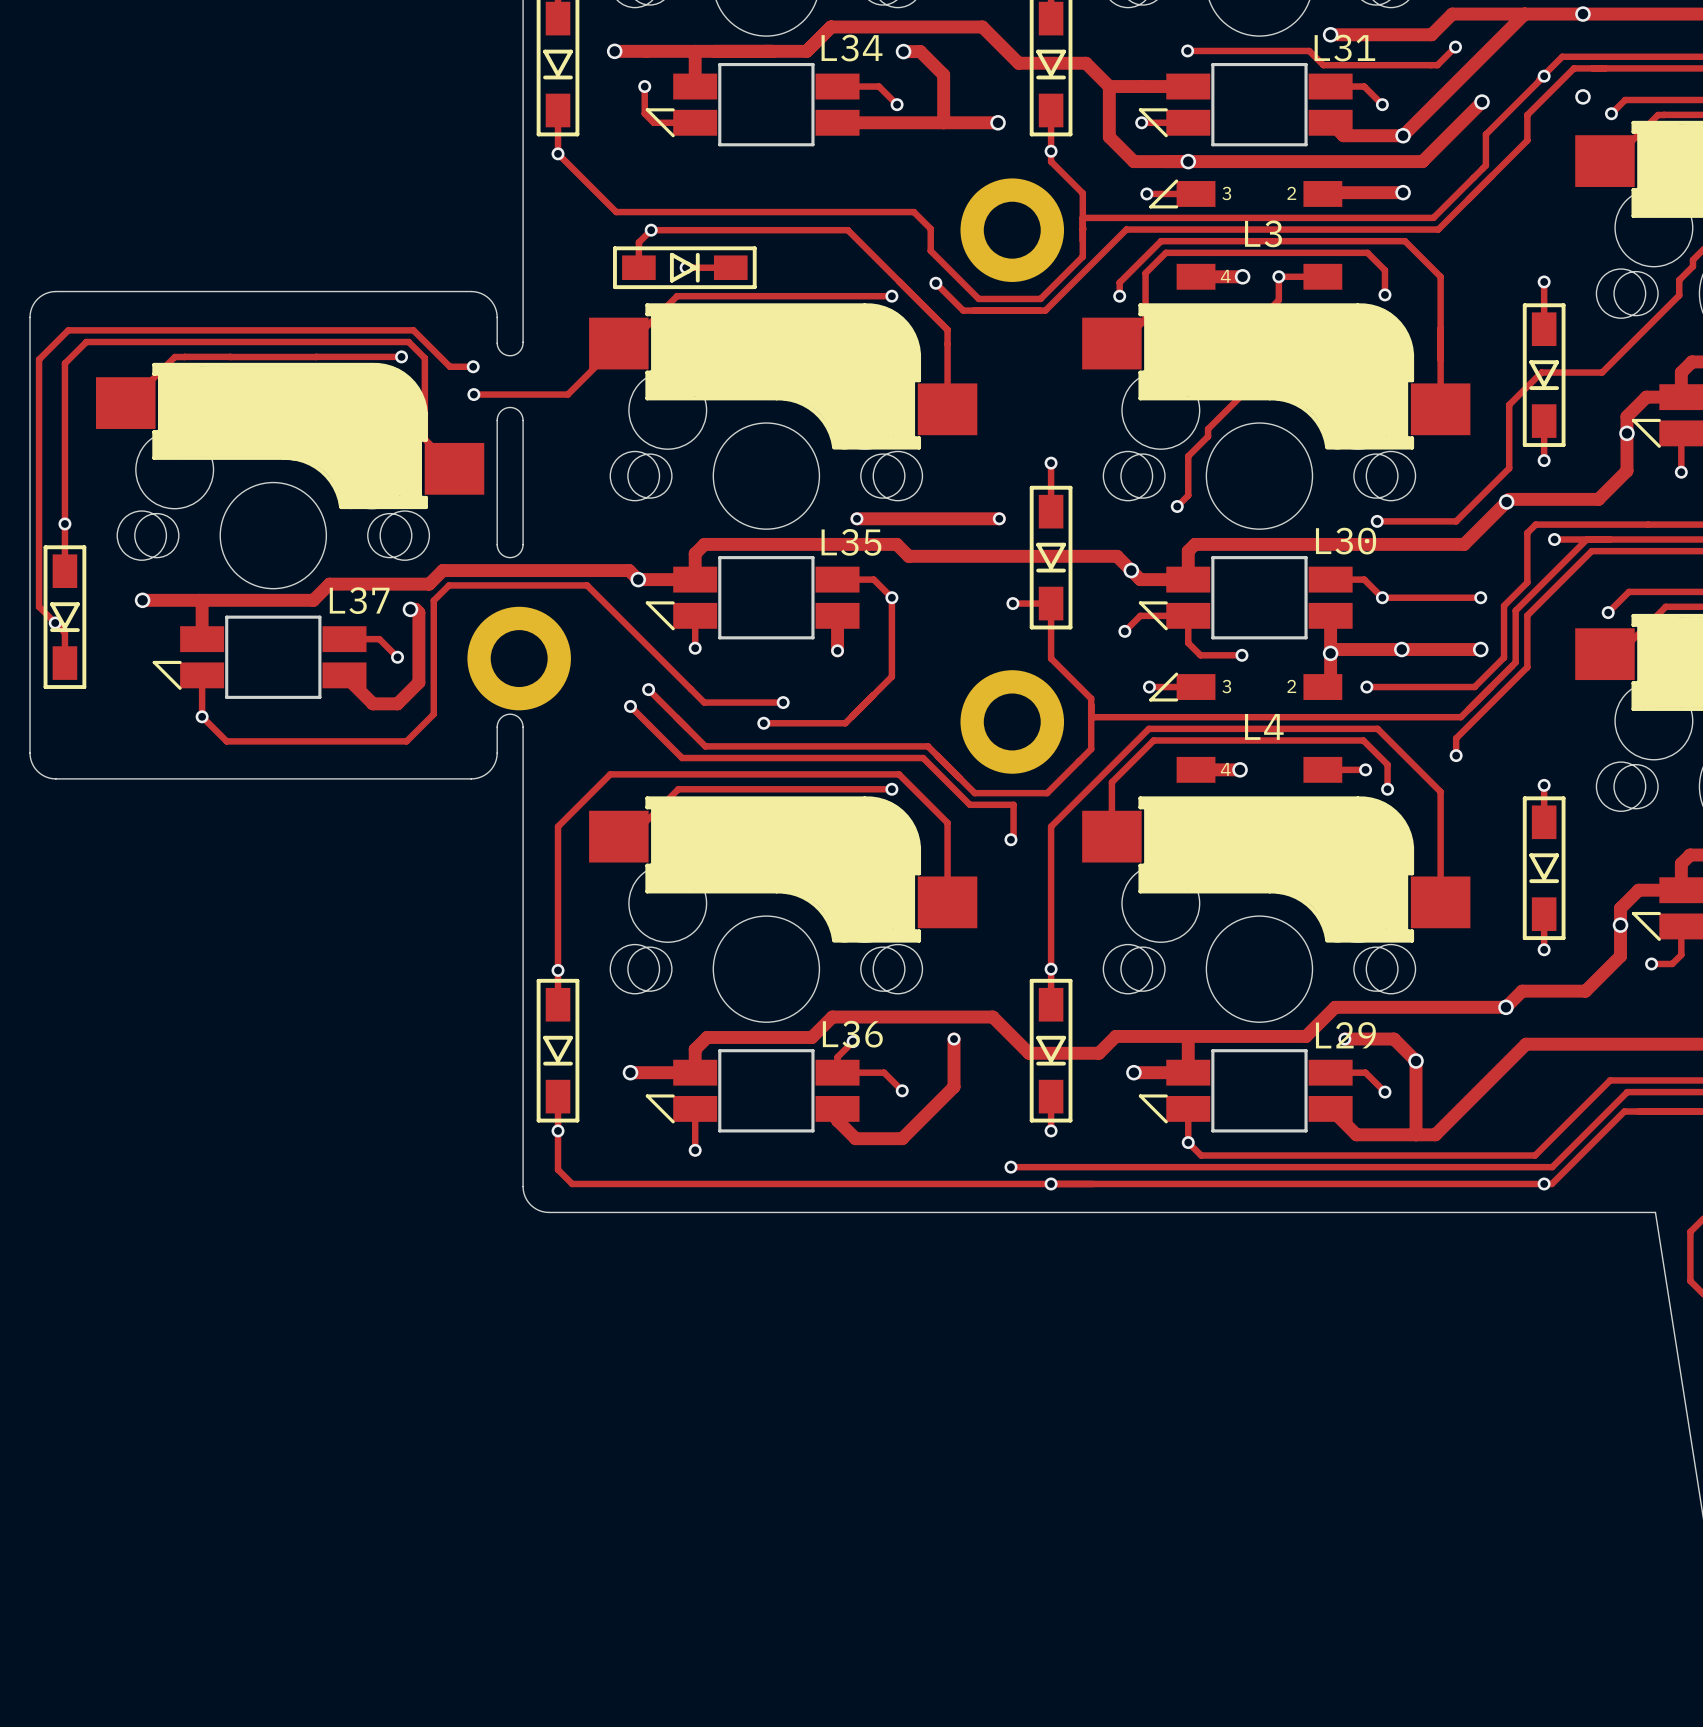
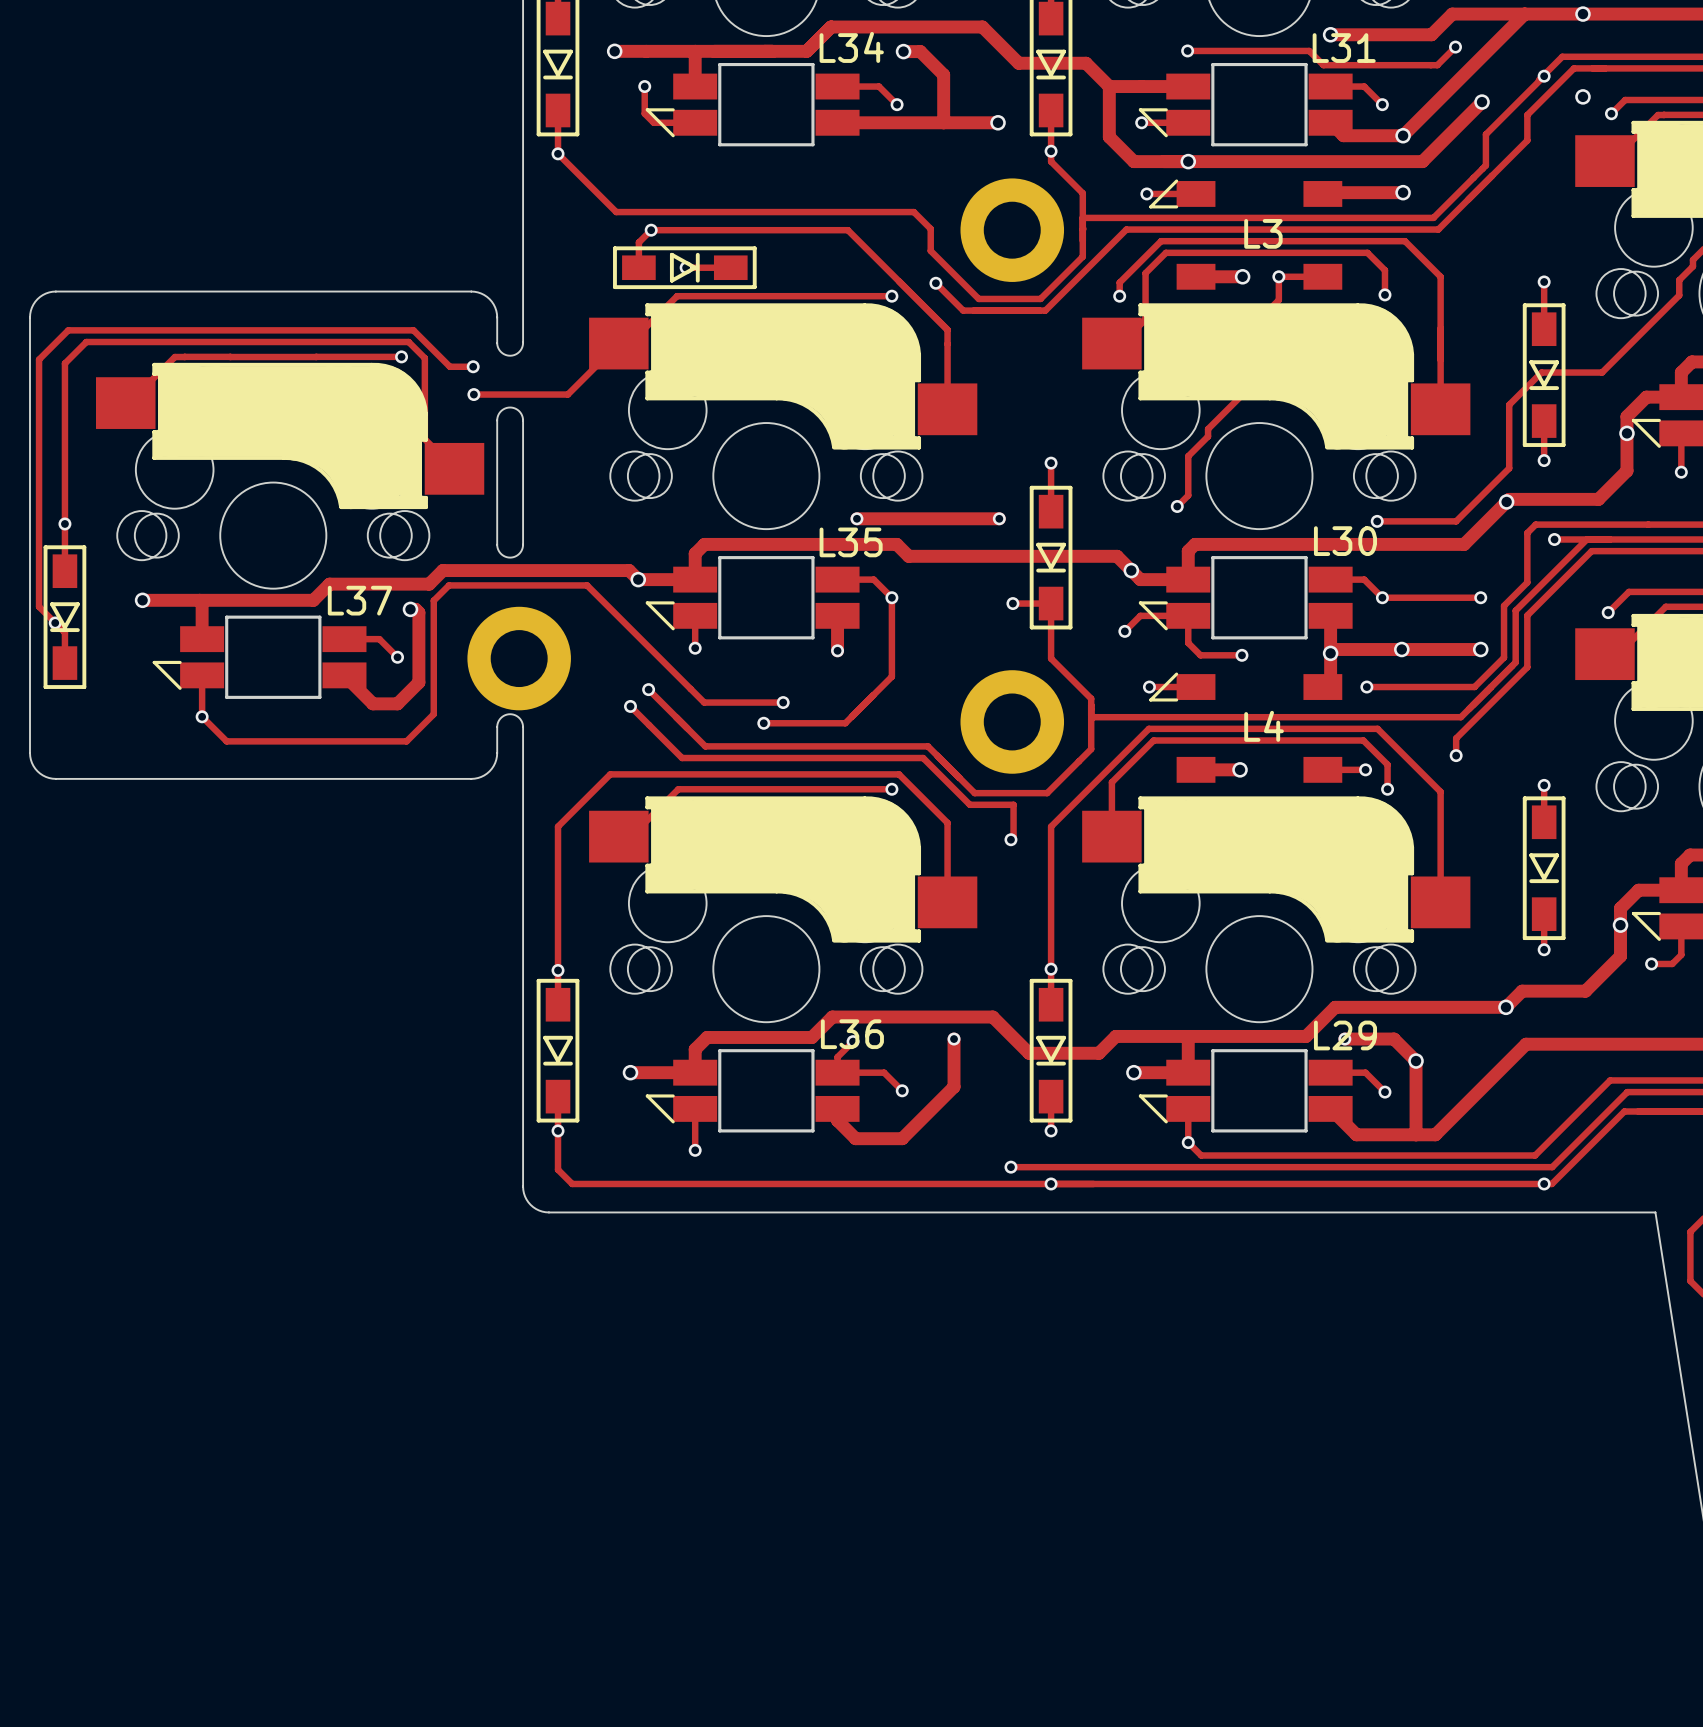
L3 text: 3 (1226, 193) -> none
L3 text: 2 (1291, 193) -> none
L3 text: 4 (1225, 276) -> none
L4 text: 3 (1226, 686) -> none
L4 text: 2 (1291, 686) -> none
L4 text: 4 (1225, 769) -> none

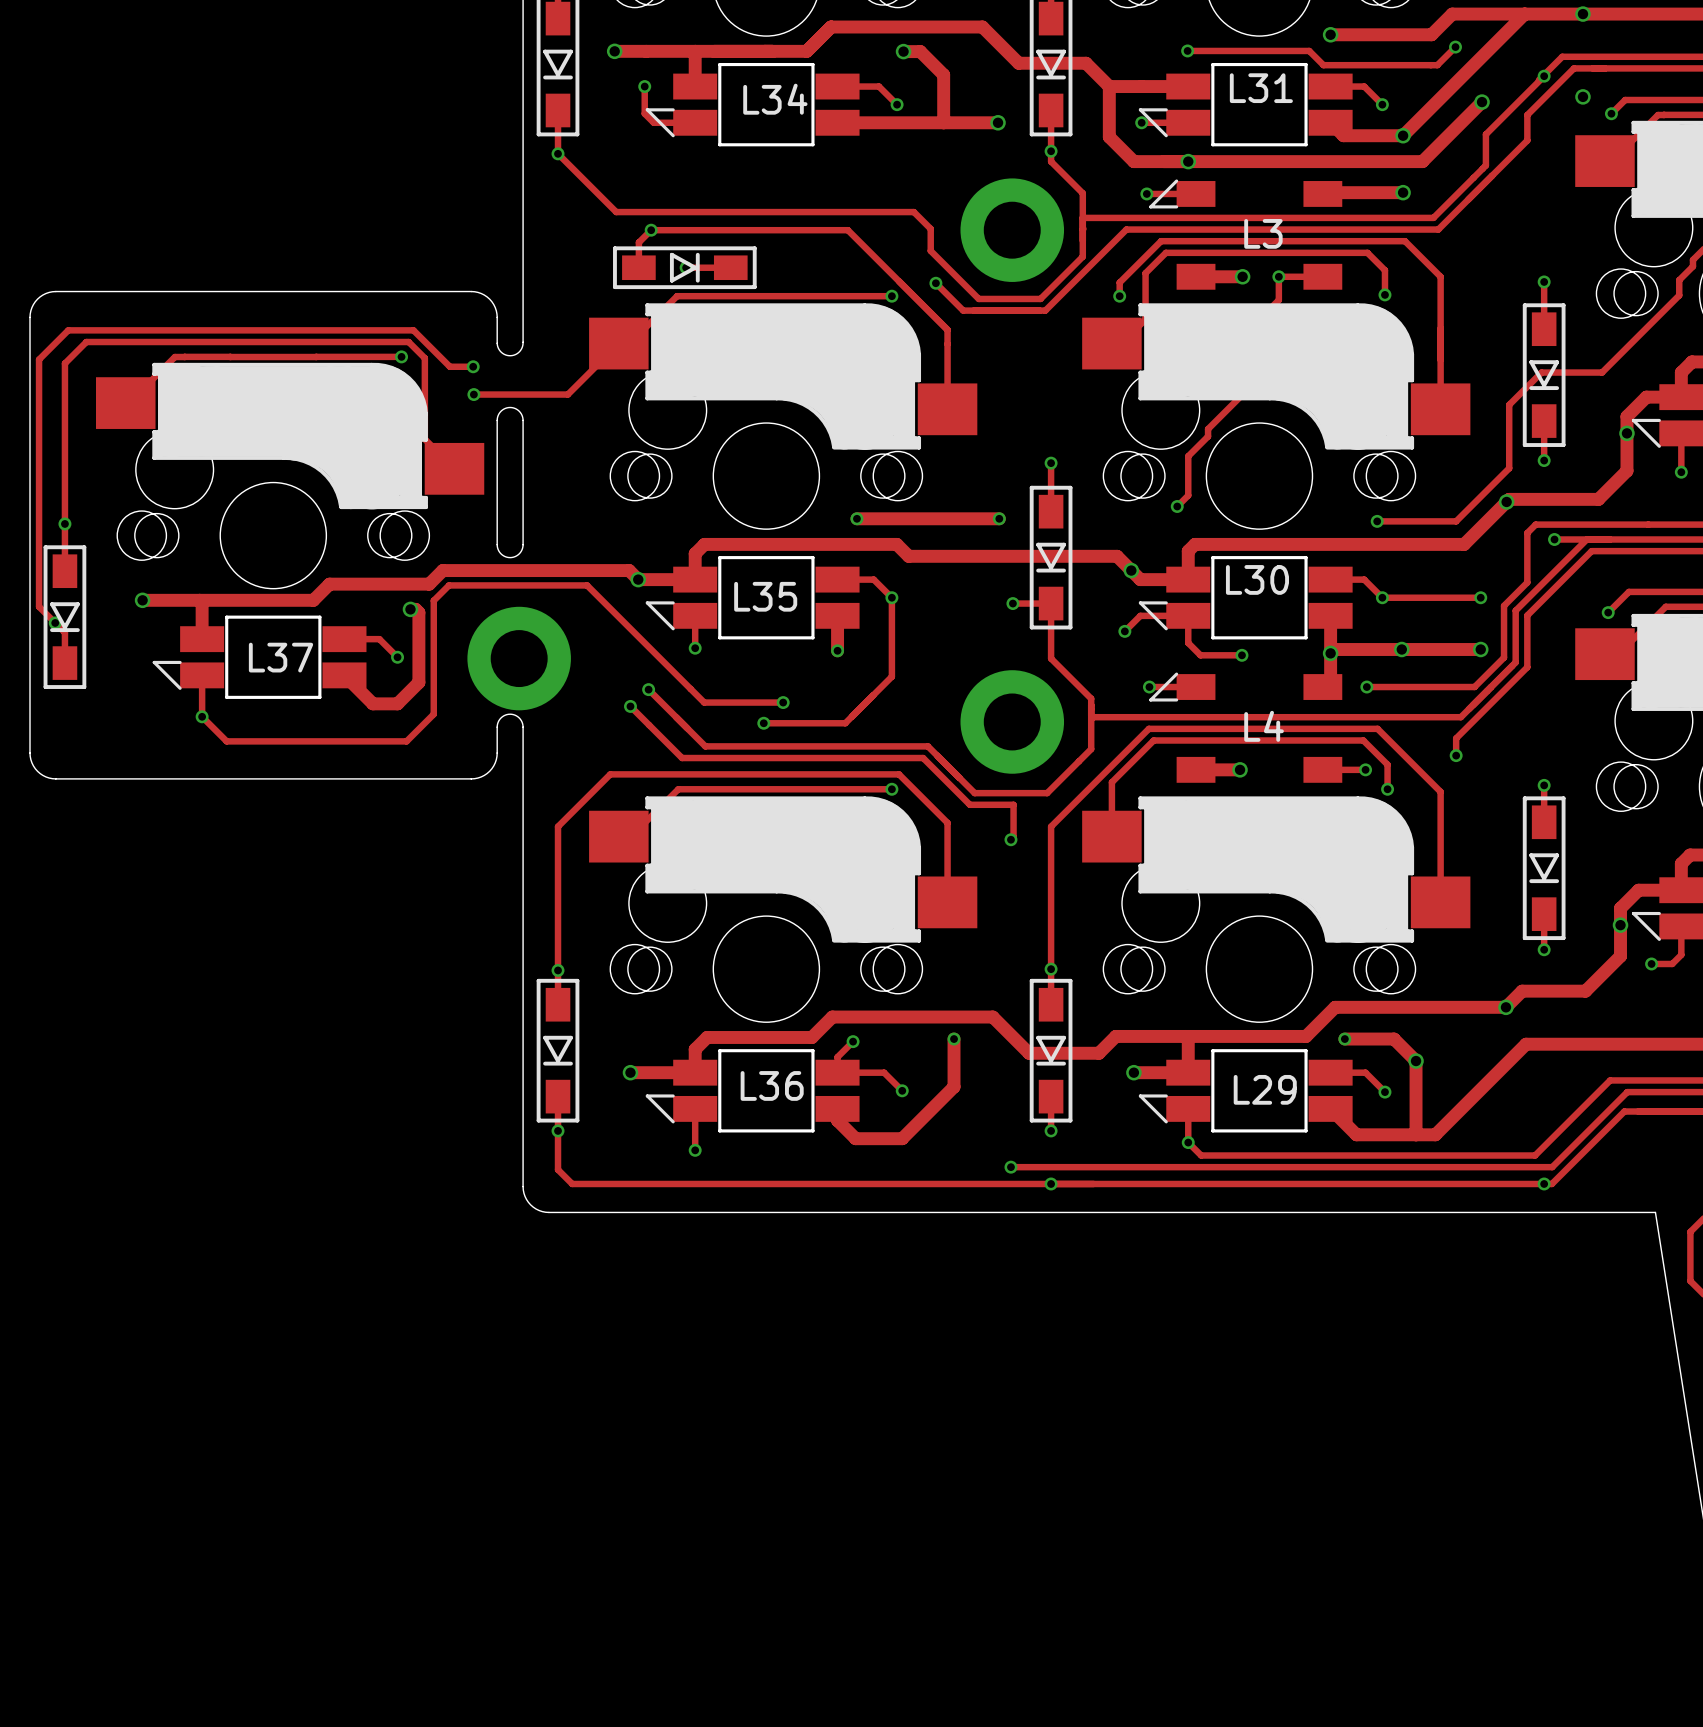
L34 name position: L34 (851, 47) -> L34 (775, 99)
L31 name position: L31 (1344, 48) -> L31 (1261, 88)
L30 name position: L30 (1345, 541) -> L30 (1257, 579)
L35 name position: L35 (851, 542) -> L35 (765, 596)
L37 name position: L37 (359, 600) -> L37 (281, 657)
L36 name position: L36 (852, 1034) -> L36 (772, 1085)
L29 name position: L29 (1345, 1035) -> L29 (1265, 1089)

